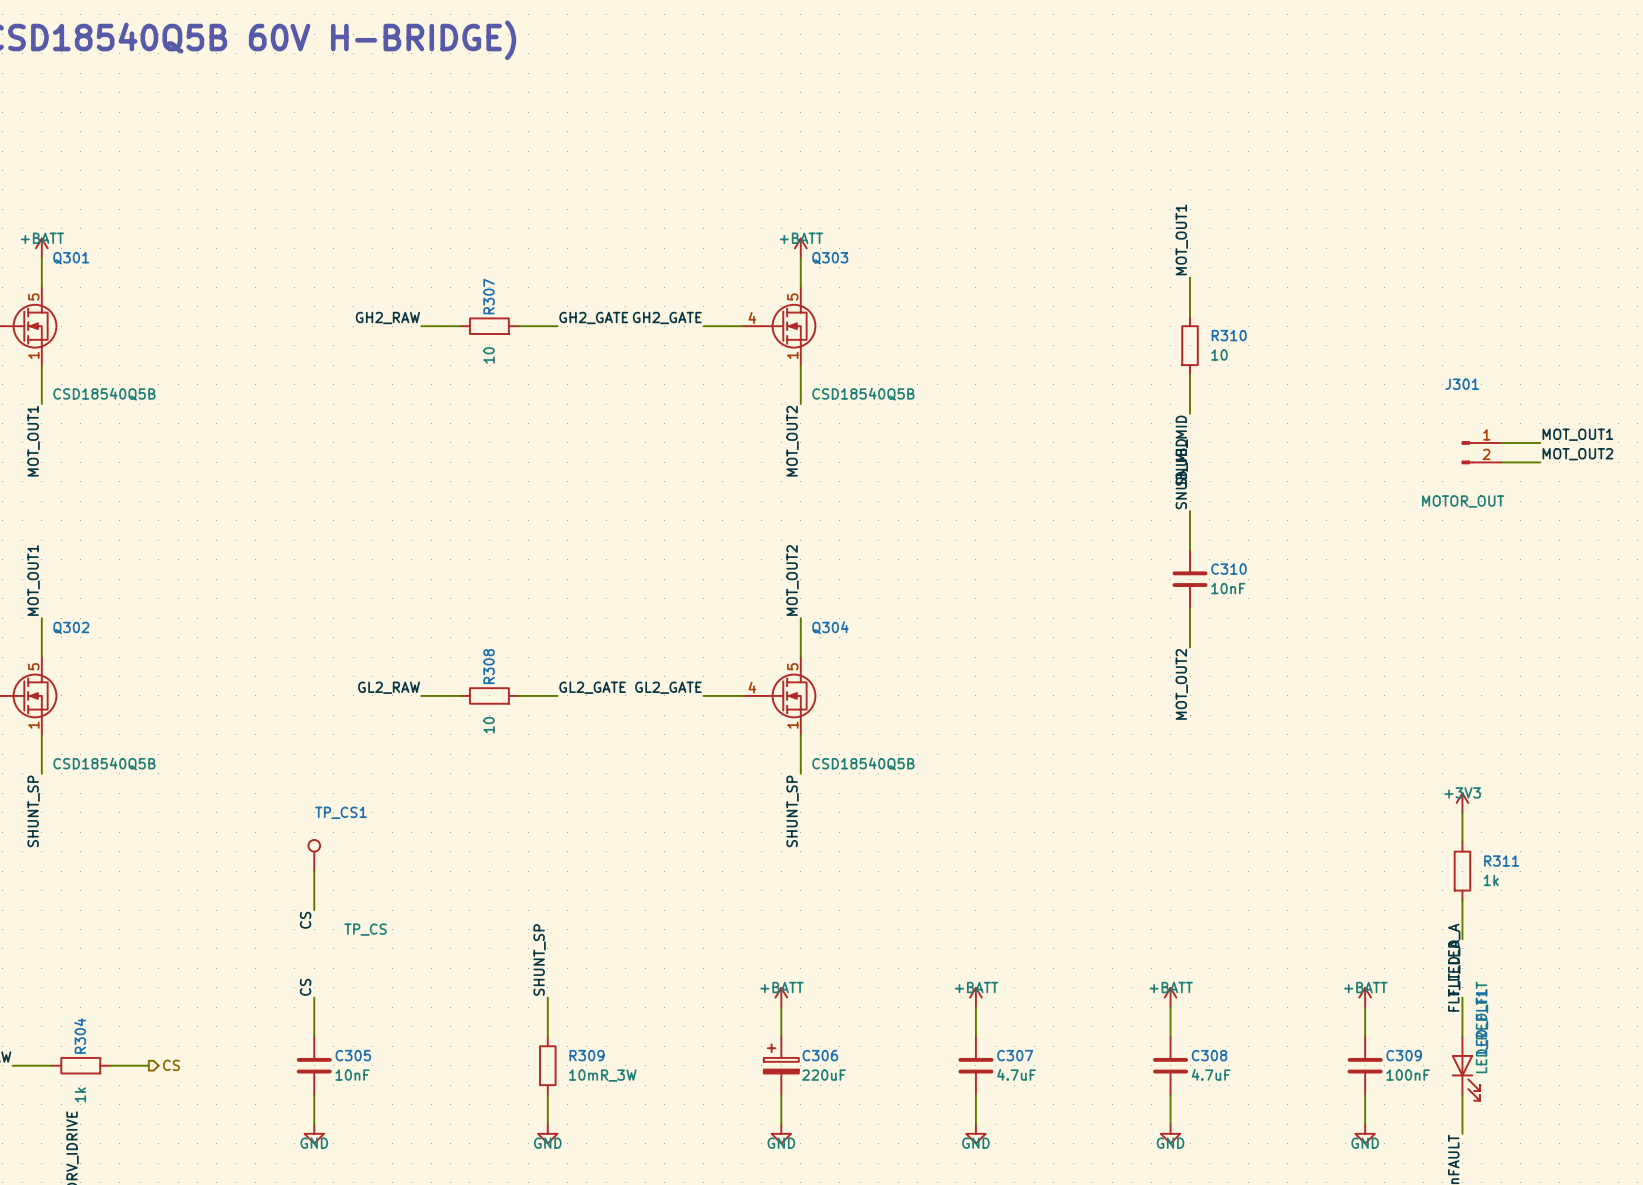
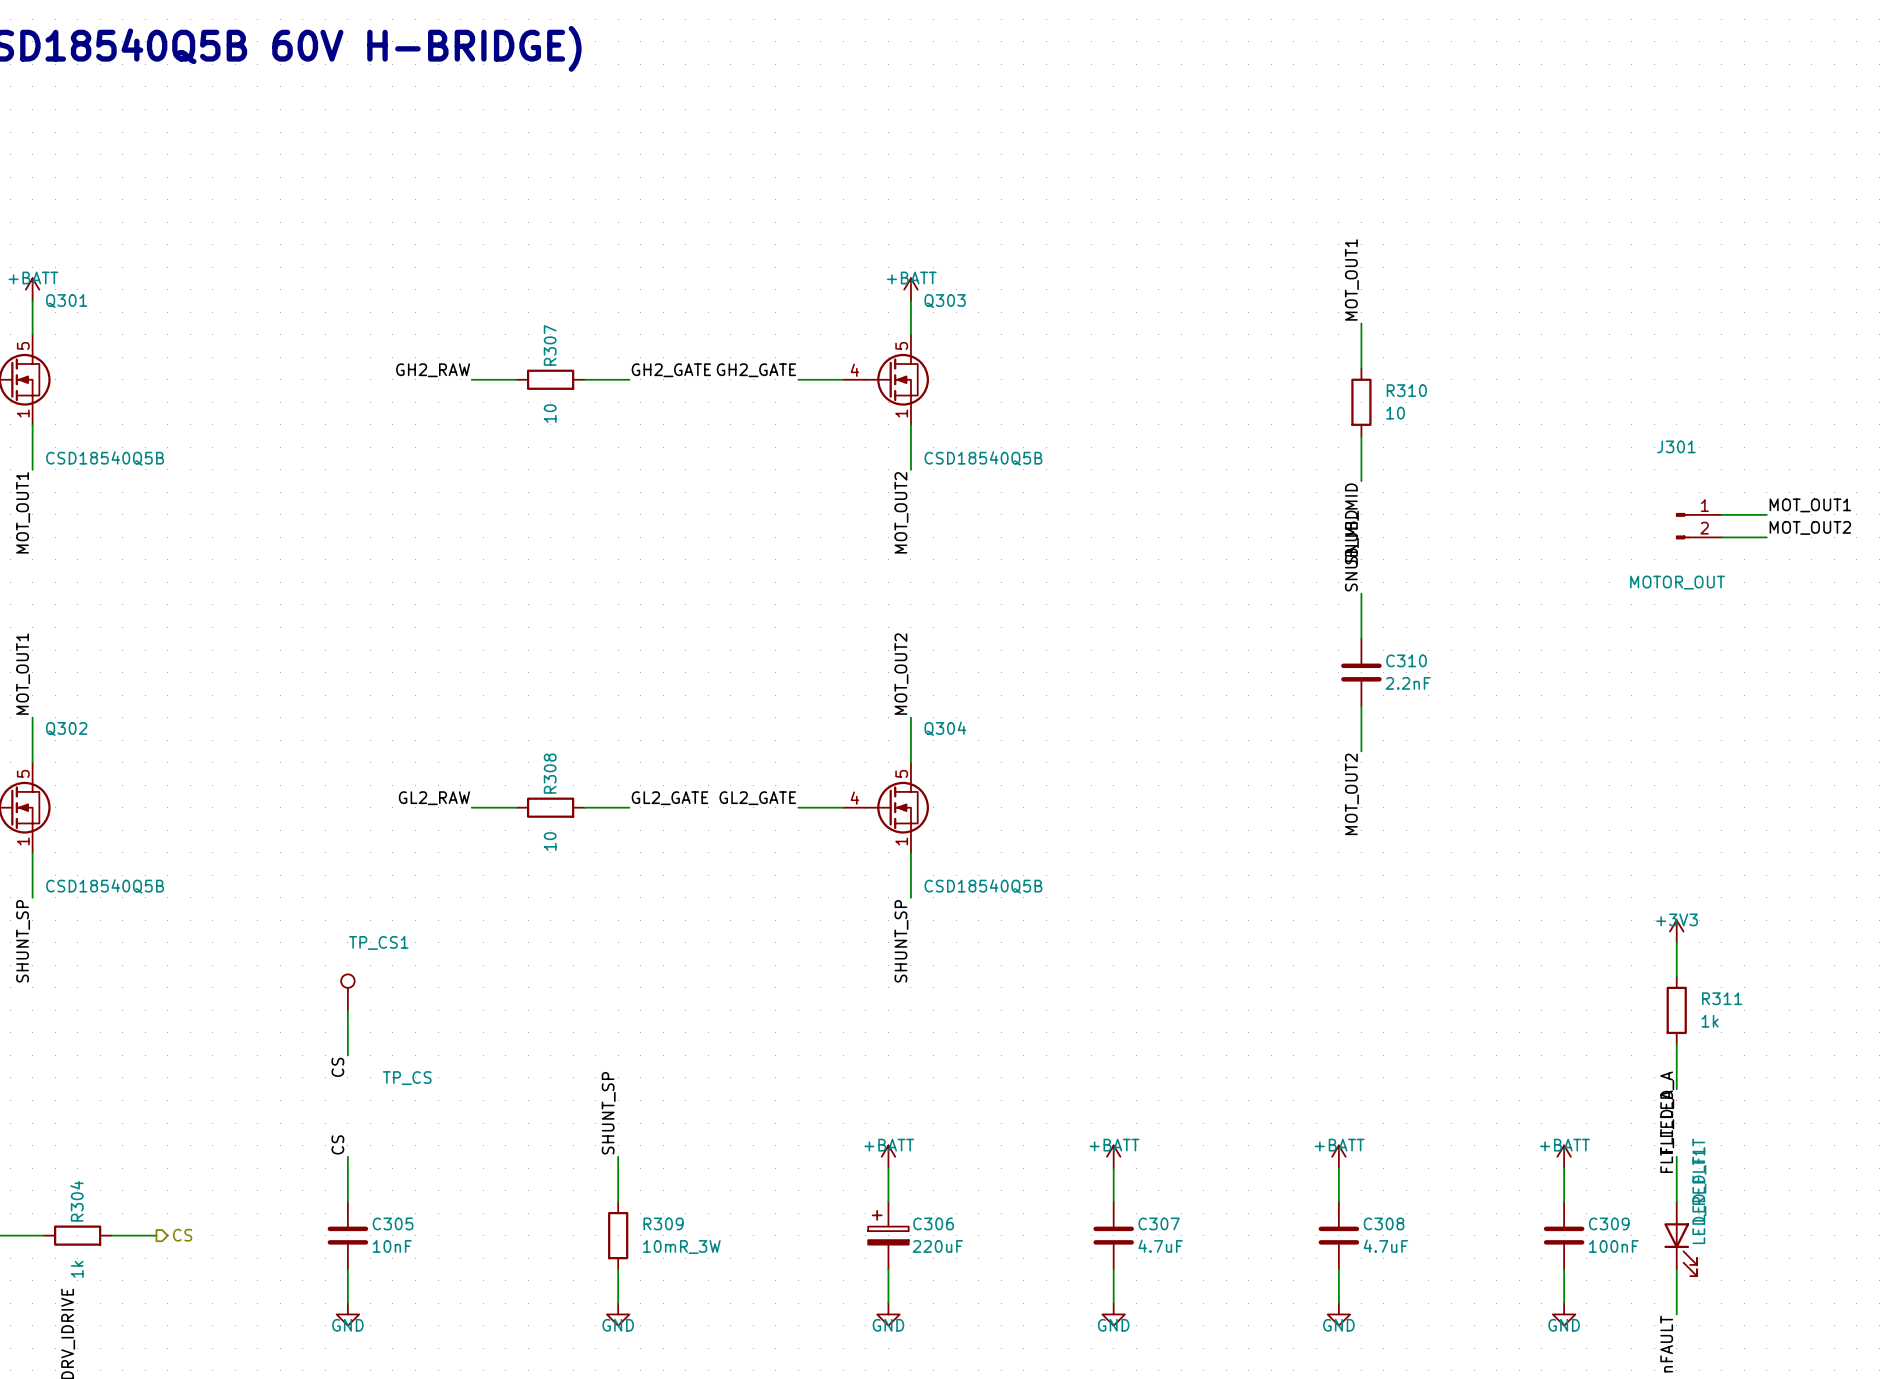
C310 value: 10nF (1228, 588) -> 2.2nF (1408, 683)

